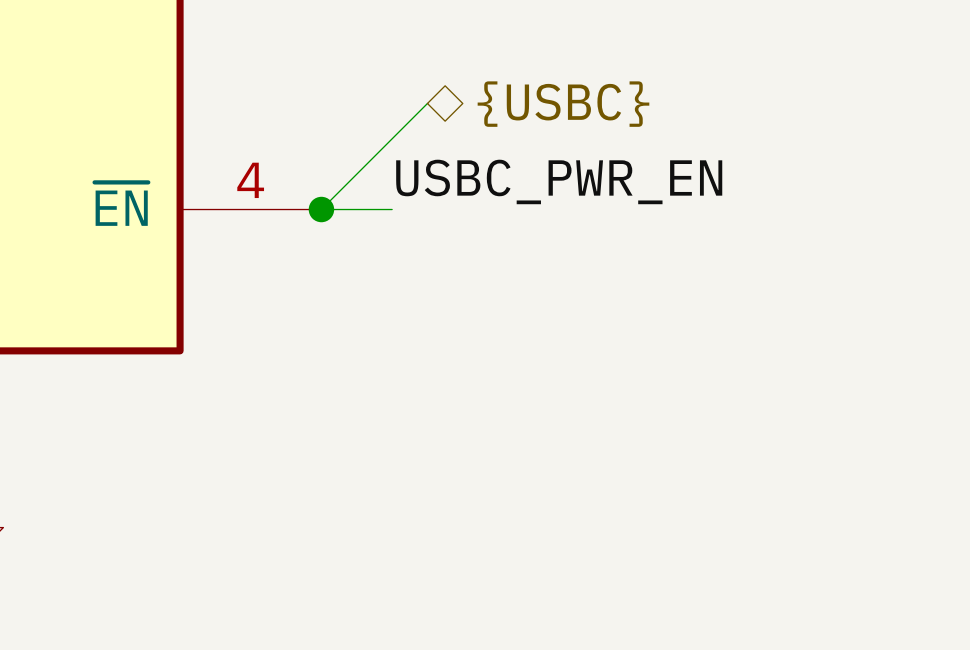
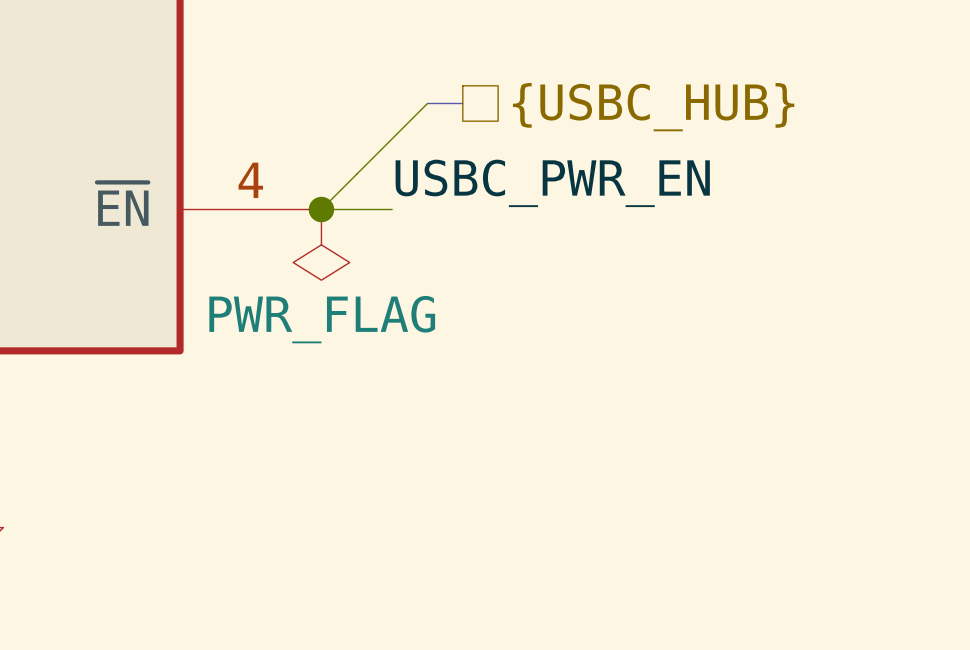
bus: none -> (427, 103) (462, 103)
hierarchical label shape: bidirectional (563, 104) -> passive (653, 107)
hierarchical label: {USBC} (563, 104) -> {USBC_HUB} (653, 107)
power symbol: none -> PWR_FLAG (321, 244)

